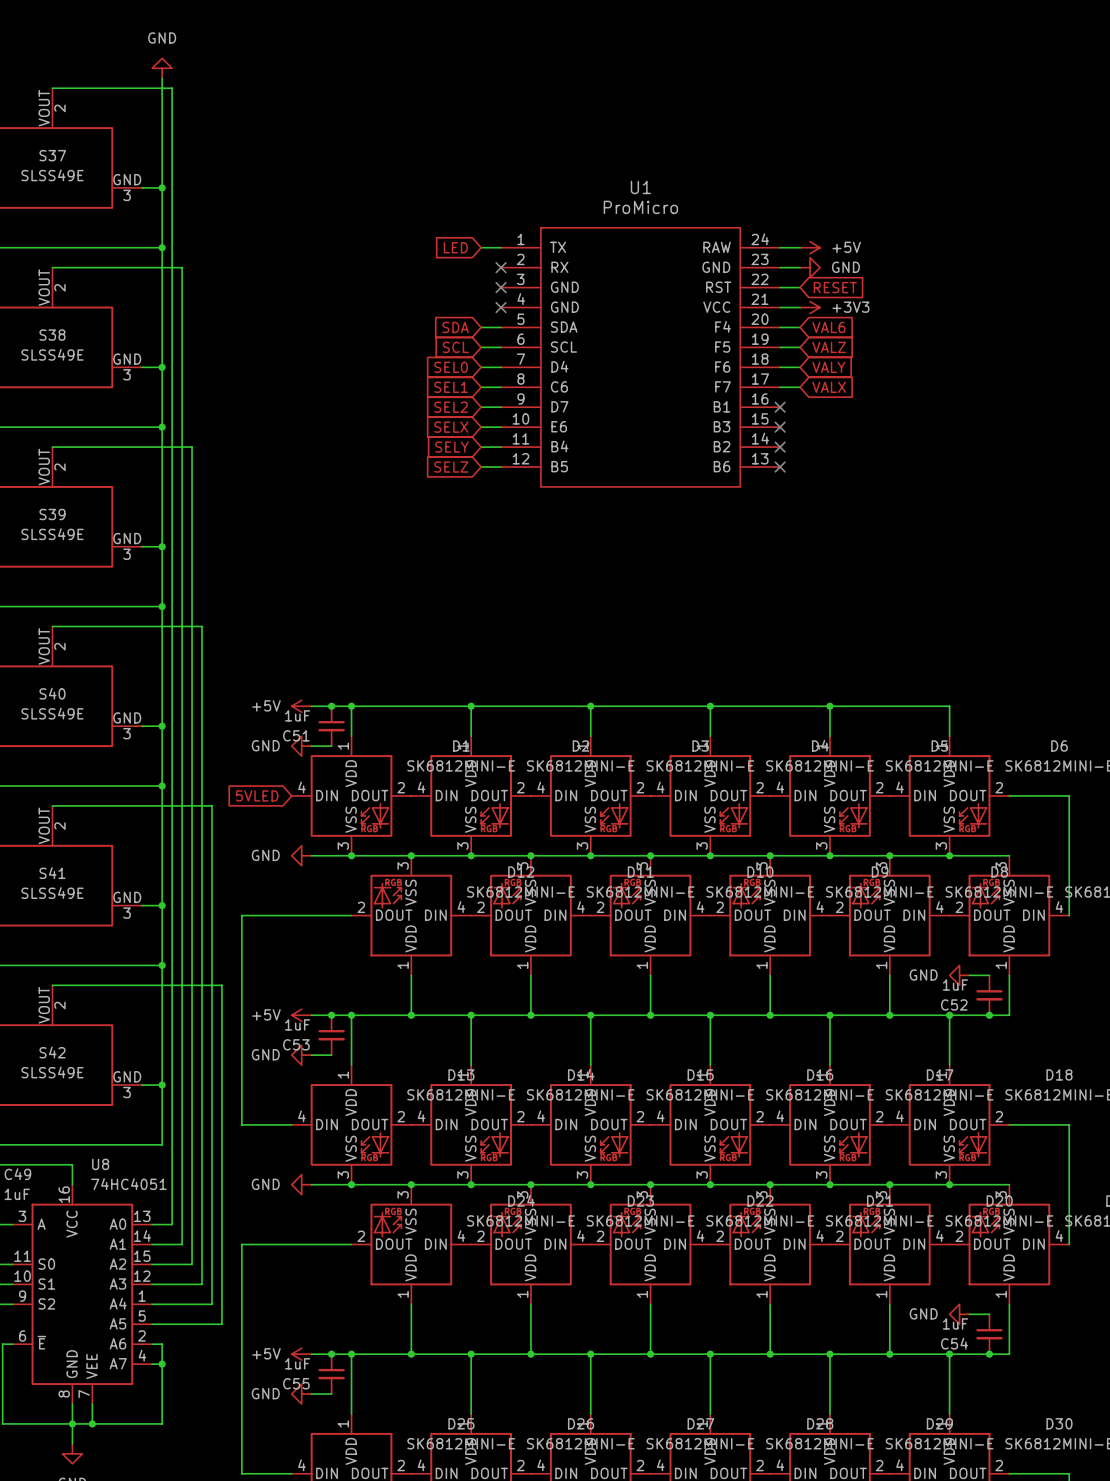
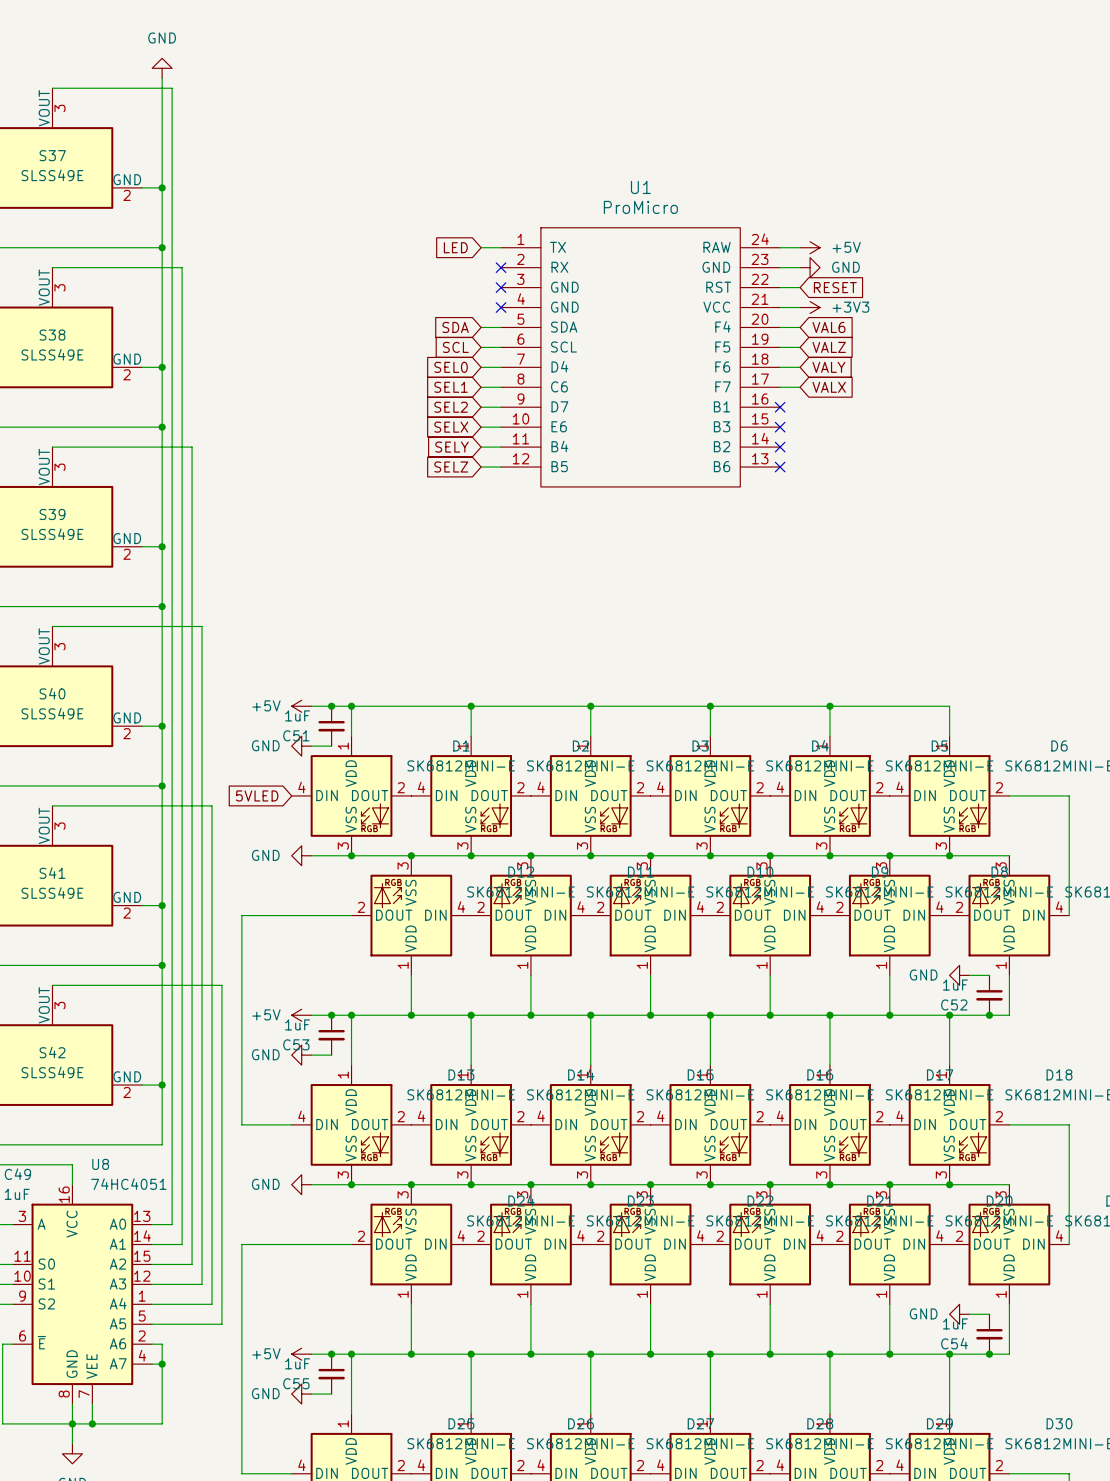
S37 pin number: 2 (59, 108) -> 3 (59, 108)
S37 pin number: 3 (127, 195) -> 2 (127, 195)
S38 pin number: 2 (59, 287) -> 3 (59, 287)
S38 pin number: 3 (127, 374) -> 2 (127, 374)
S39 pin number: 2 (59, 467) -> 3 (59, 467)
S39 pin number: 3 (127, 554) -> 2 (127, 554)
S40 pin number: 2 (59, 646) -> 3 (59, 646)
S40 pin number: 3 (127, 733) -> 2 (127, 733)
S41 pin number: 2 (59, 826) -> 3 (59, 826)
S41 pin number: 3 (127, 913) -> 2 (127, 913)
S42 pin number: 2 (59, 1005) -> 3 (59, 1005)
S42 pin number: 3 (127, 1092) -> 2 (127, 1092)

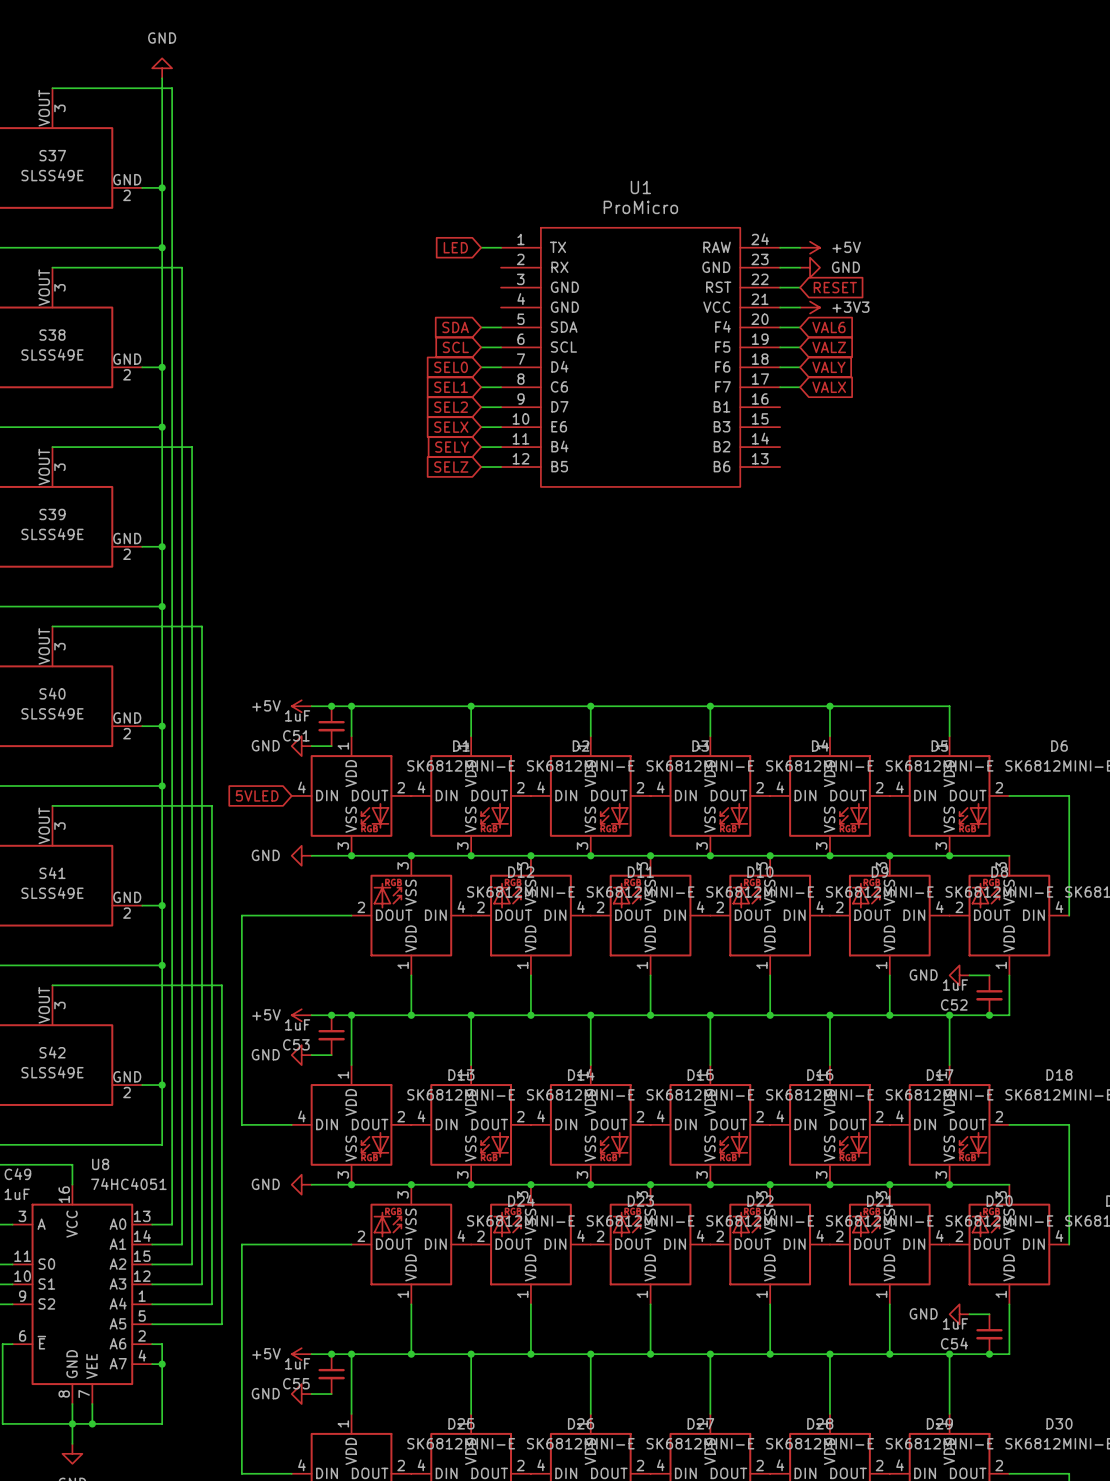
no-connect mark: (501, 267) -> none
no-connect mark: (501, 287) -> none
no-connect mark: (501, 307) -> none
no-connect mark: (780, 407) -> none
no-connect mark: (780, 427) -> none
no-connect mark: (780, 447) -> none
no-connect mark: (780, 467) -> none

